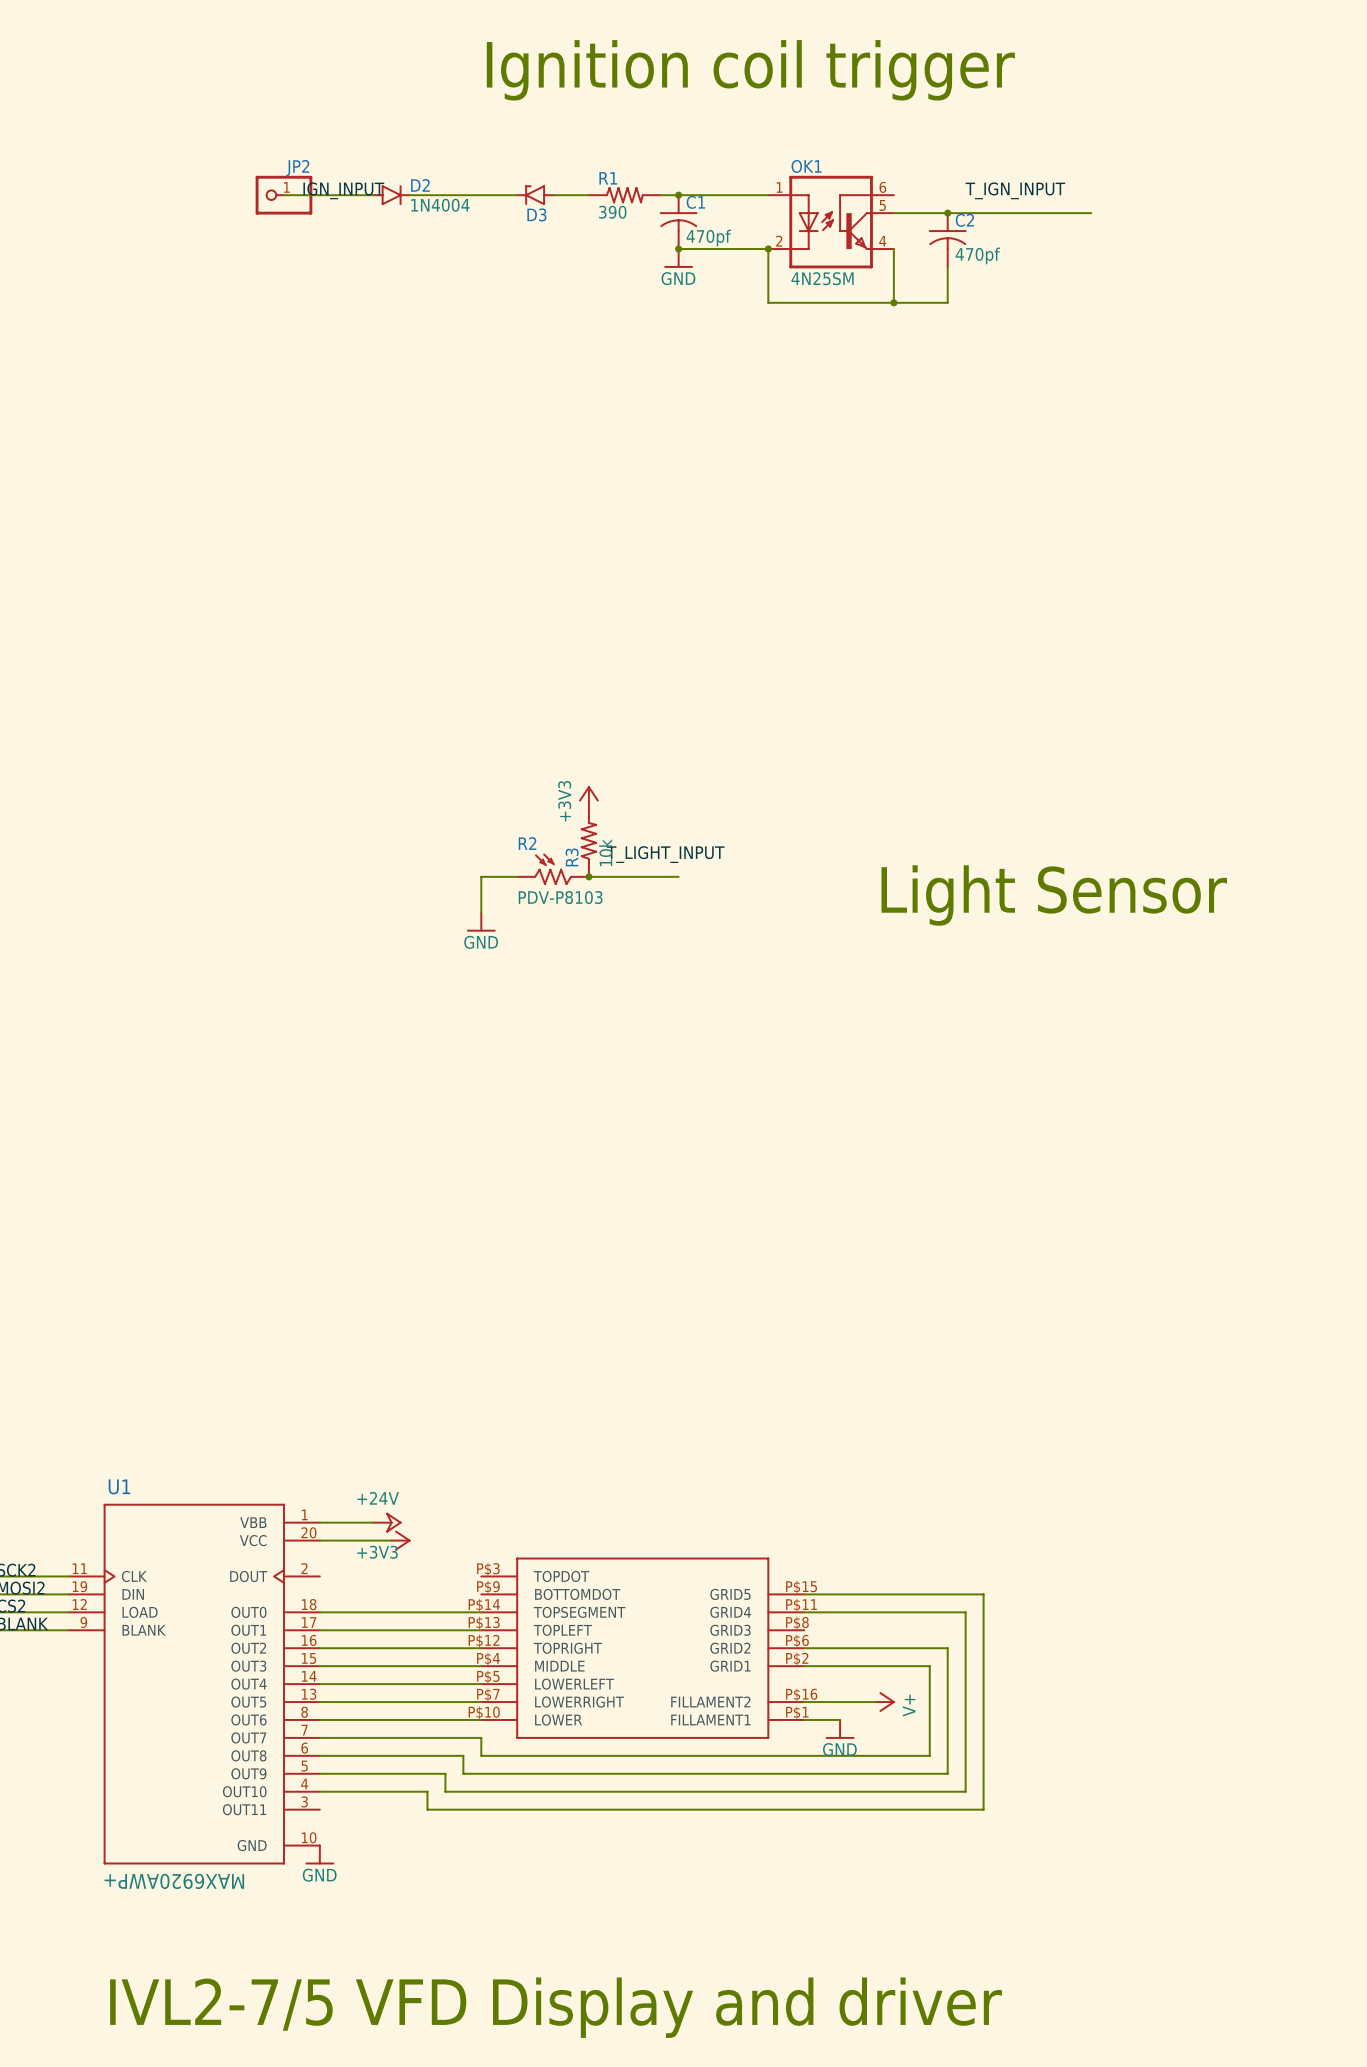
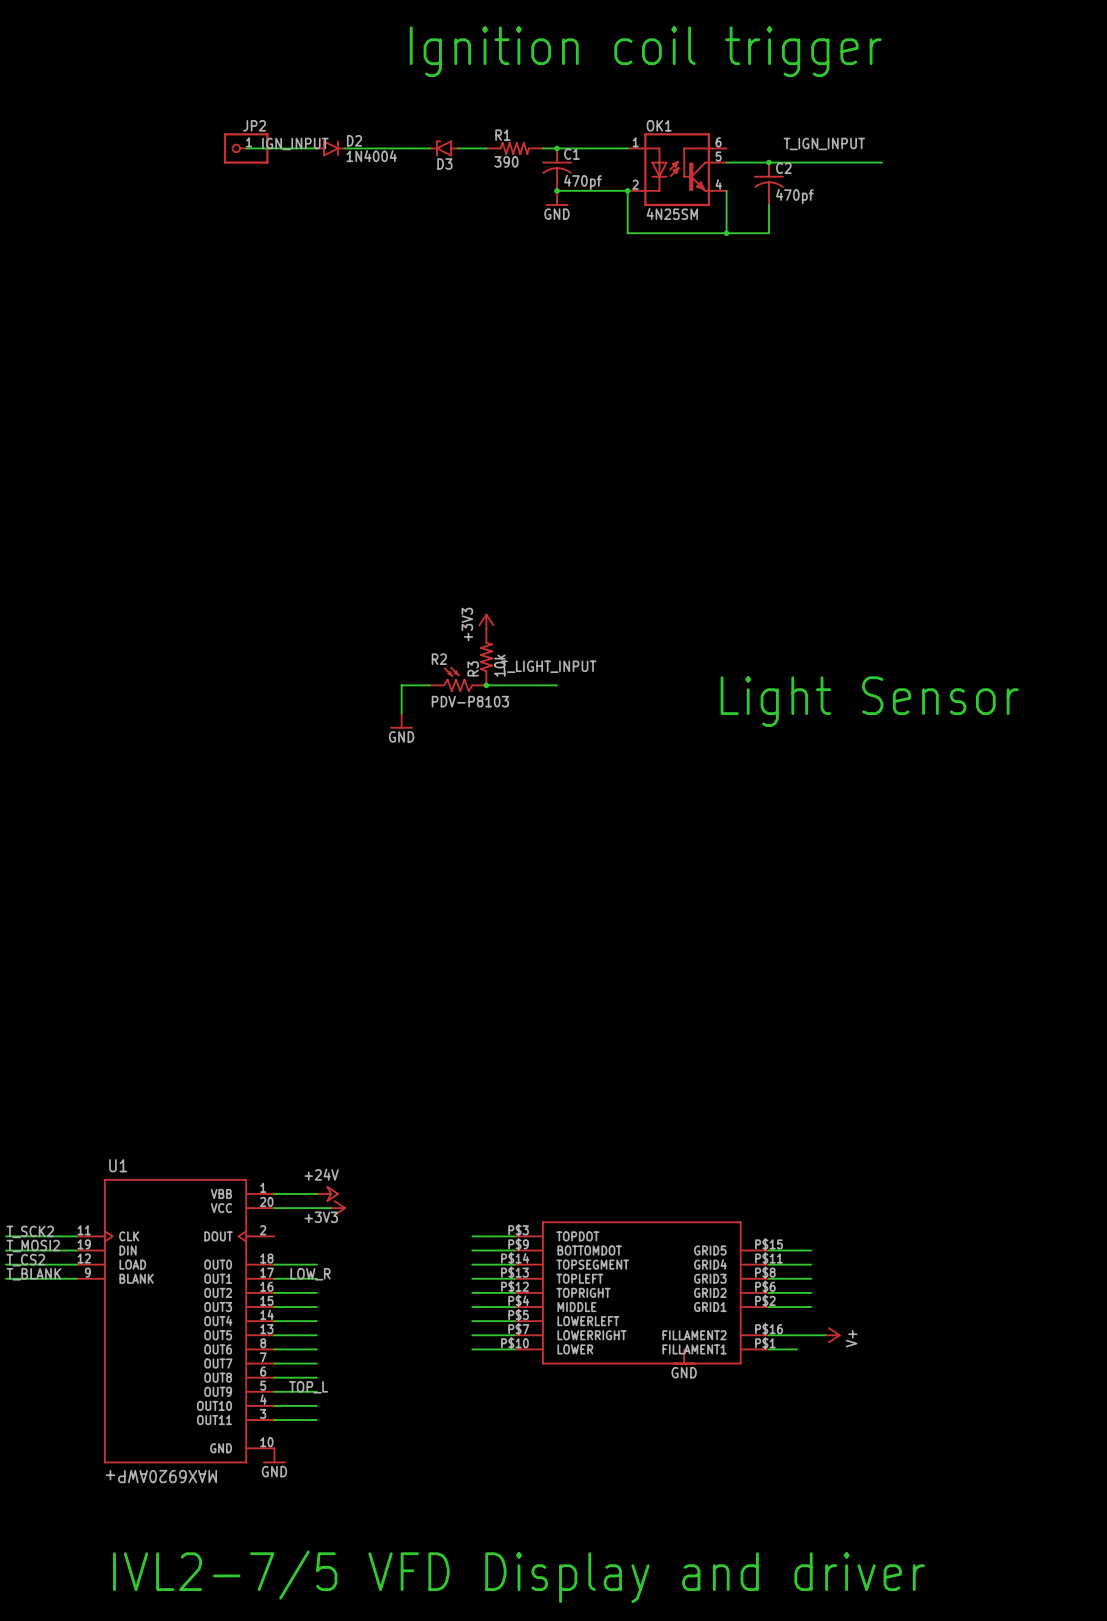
wire: none -> (472, 1236) (514, 1236)
wire: none -> (472, 1250) (514, 1250)
wire: (804, 1594) (947, 1594) -> none
wire: (983, 1594) (983, 1809) (427, 1809) (427, 1791) (373, 1791) -> (797, 1250) (811, 1250)
wire: (373, 1612) (481, 1612) -> none
wire: (804, 1612) (947, 1612) -> none
wire: (965, 1612) (965, 1791) (445, 1791) (445, 1773) (373, 1773) -> (783, 1264) (811, 1264)
label: none -> LOW_R (310, 1274)
wire: (373, 1630) (481, 1630) -> none
wire: none -> (472, 1278) (514, 1278)
wire: none -> (768, 1278) (811, 1278)
wire: (373, 1648) (481, 1648) -> none
wire: none -> (472, 1292) (514, 1292)
part position: (642, 1648) -> (641, 1292)
wire: (804, 1648) (947, 1648) (947, 1773) (463, 1773) (463, 1755) (373, 1755) -> none
wire: none -> (768, 1292) (811, 1292)
wire: (373, 1666) (481, 1666) -> none
wire: none -> (472, 1307) (514, 1307)
wire: (804, 1666) (929, 1666) (929, 1755) (481, 1755) (481, 1737) (373, 1737) -> none
wire: none -> (768, 1307) (811, 1307)
wire: (373, 1684) (481, 1684) -> none
wire: none -> (472, 1321) (514, 1321)
wire: (373, 1702) (481, 1702) -> none
wire: (804, 1702) (875, 1702) -> (768, 1335) (825, 1335)
power symbol position: V+ (885, 1702) -> V+ (832, 1335)
wire: (373, 1719) (481, 1719) -> none
wire: none -> (472, 1349) (514, 1349)
wire: (804, 1719) (840, 1719) -> (768, 1349) (797, 1349)
label: none -> TOP_L (308, 1387)
wire: none -> (274, 1420) (316, 1420)

